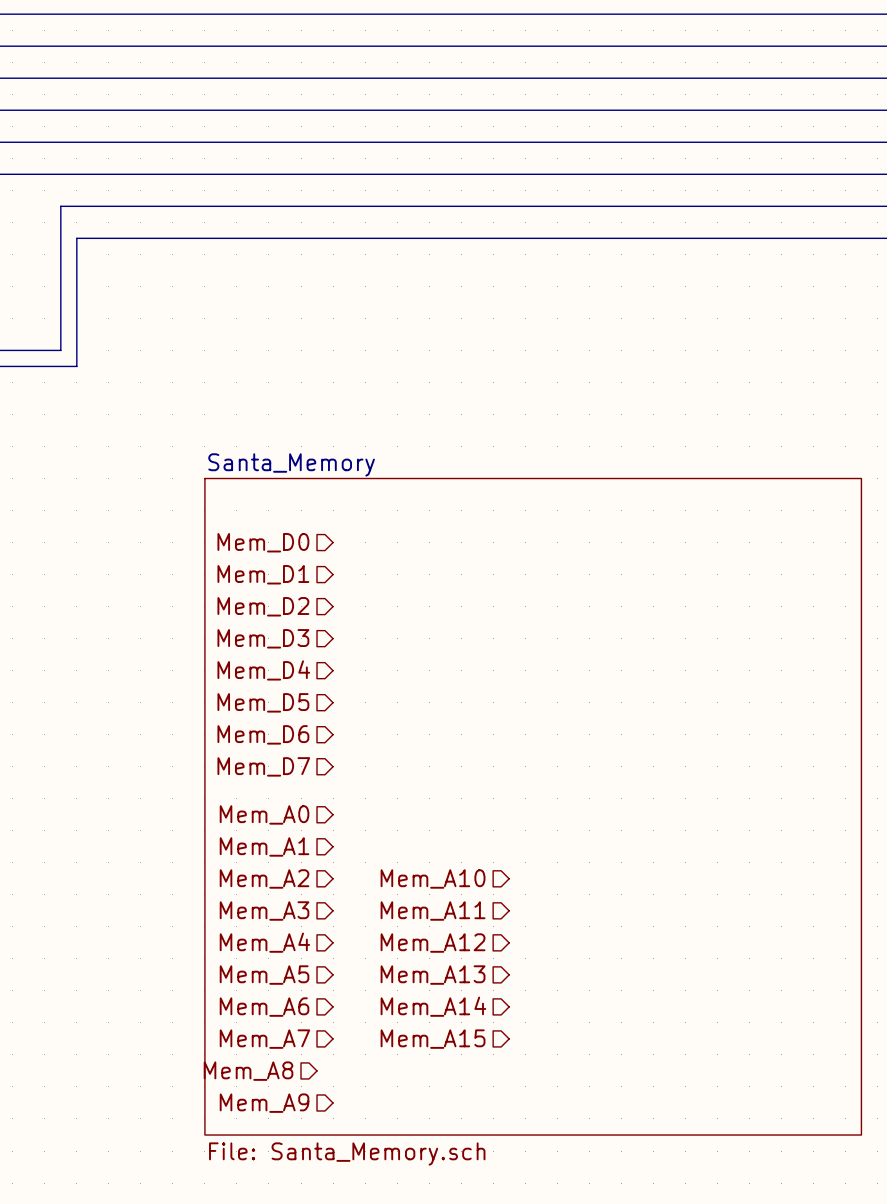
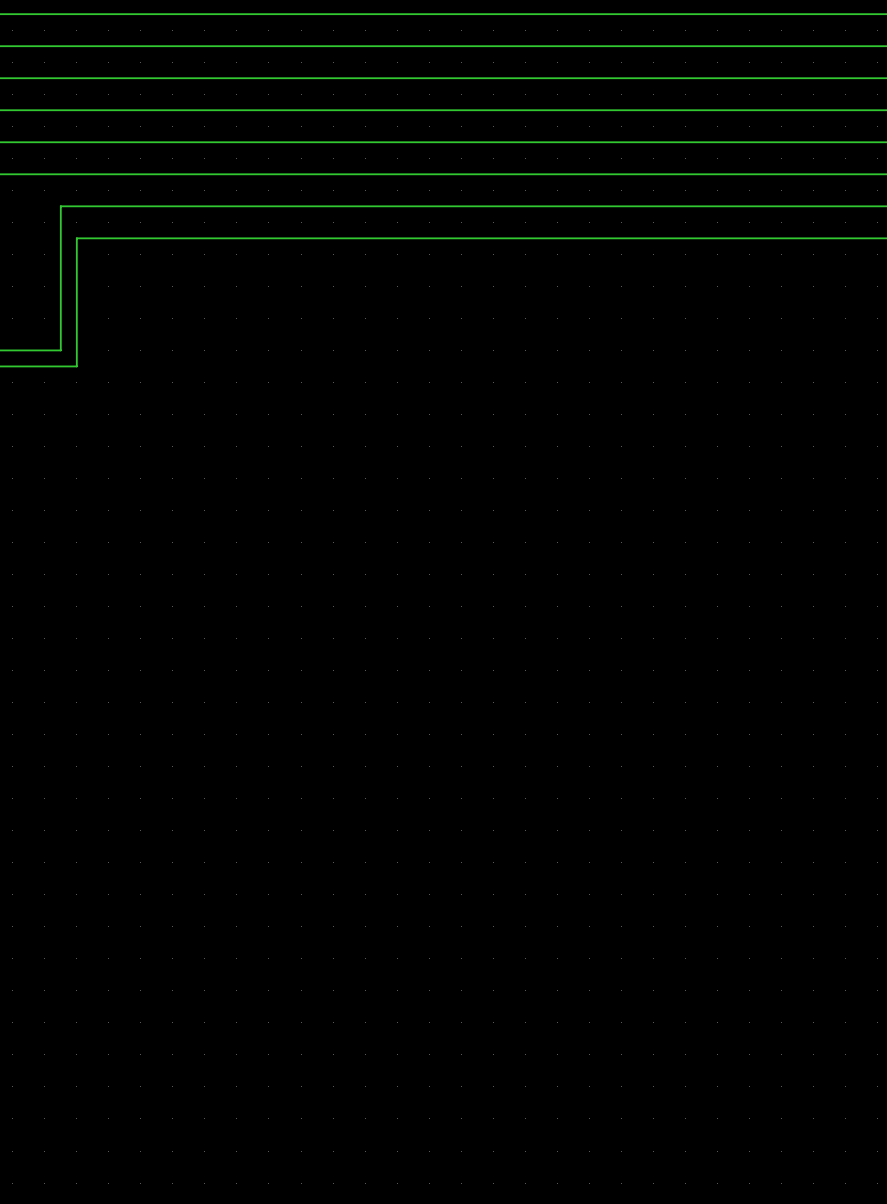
hierarchical label: Mem_D0 (263, 542) -> none
hierarchical label: Mem_D1 (263, 574) -> none
hierarchical label: Mem_D2 (263, 606) -> none
hierarchical label: Mem_D3 (263, 638) -> none
hierarchical label: Mem_D4 (263, 670) -> none
hierarchical label: Mem_D5 (263, 702) -> none
hierarchical label: Mem_D6 (263, 734) -> none
hierarchical label: Mem_D7 (263, 766) -> none
sheet Santa_Memory: File: Santa_Memory.sch (533, 806) -> none
hierarchical label: Mem_A0 (264, 814) -> none
hierarchical label: Mem_A1 (264, 846) -> none
hierarchical label: Mem_A2 (264, 878) -> none
hierarchical label: Mem_A10 (433, 878) -> none
hierarchical label: Mem_A3 (264, 911) -> none
hierarchical label: Mem_A11 (433, 911) -> none
hierarchical label: Mem_A4 (264, 942) -> none
hierarchical label: Mem_A12 (433, 943) -> none
hierarchical label: Mem_A5 (264, 975) -> none
hierarchical label: Mem_A13 (433, 975) -> none
hierarchical label: Mem_A14 (433, 1006) -> none
hierarchical label: Mem_A6 (264, 1007) -> none
hierarchical label: Mem_A7 (264, 1039) -> none
hierarchical label: Mem_A15 (433, 1039) -> none
hierarchical label: Mem_A8 (248, 1071) -> none
hierarchical label: Mem_A9 (264, 1103) -> none

